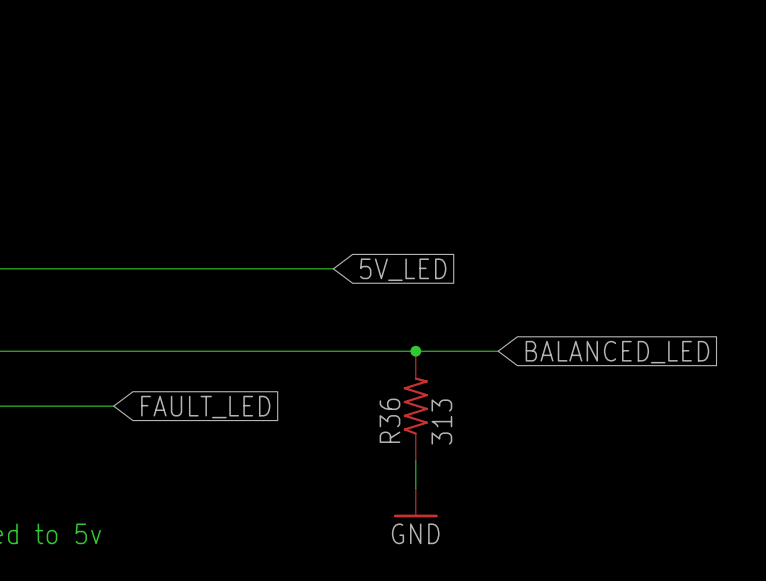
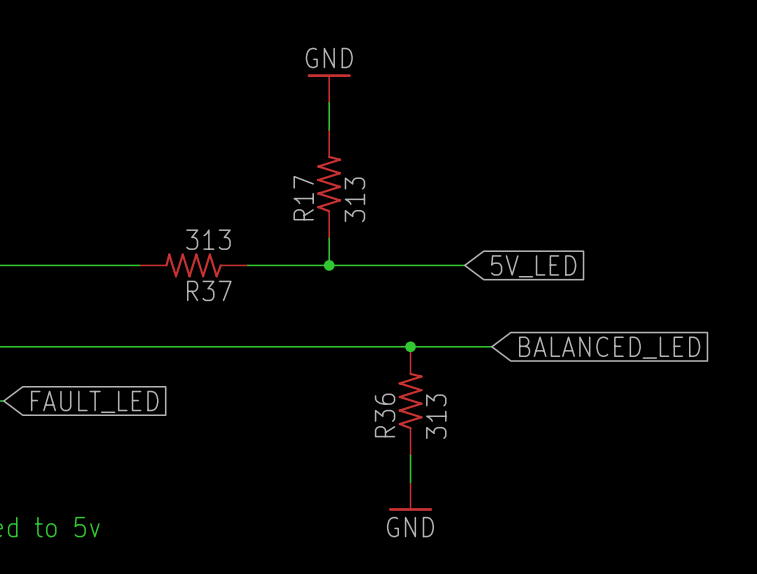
power symbol: none -> GND (329, 88)
wire: none -> (329, 102) (329, 129)
R17: none -> 313 (329, 184)
wire: none -> (329, 238) (329, 265) (464, 265)
R37: none -> 313 (193, 265)
junction: none -> (329, 265)
global label position: 5V_LED (403, 269) -> 5V_LED (533, 266)
wire: (3, 406) (113, 406) -> none
global label position: FAULT_LED (205, 407) -> FAULT_LED (94, 401)

